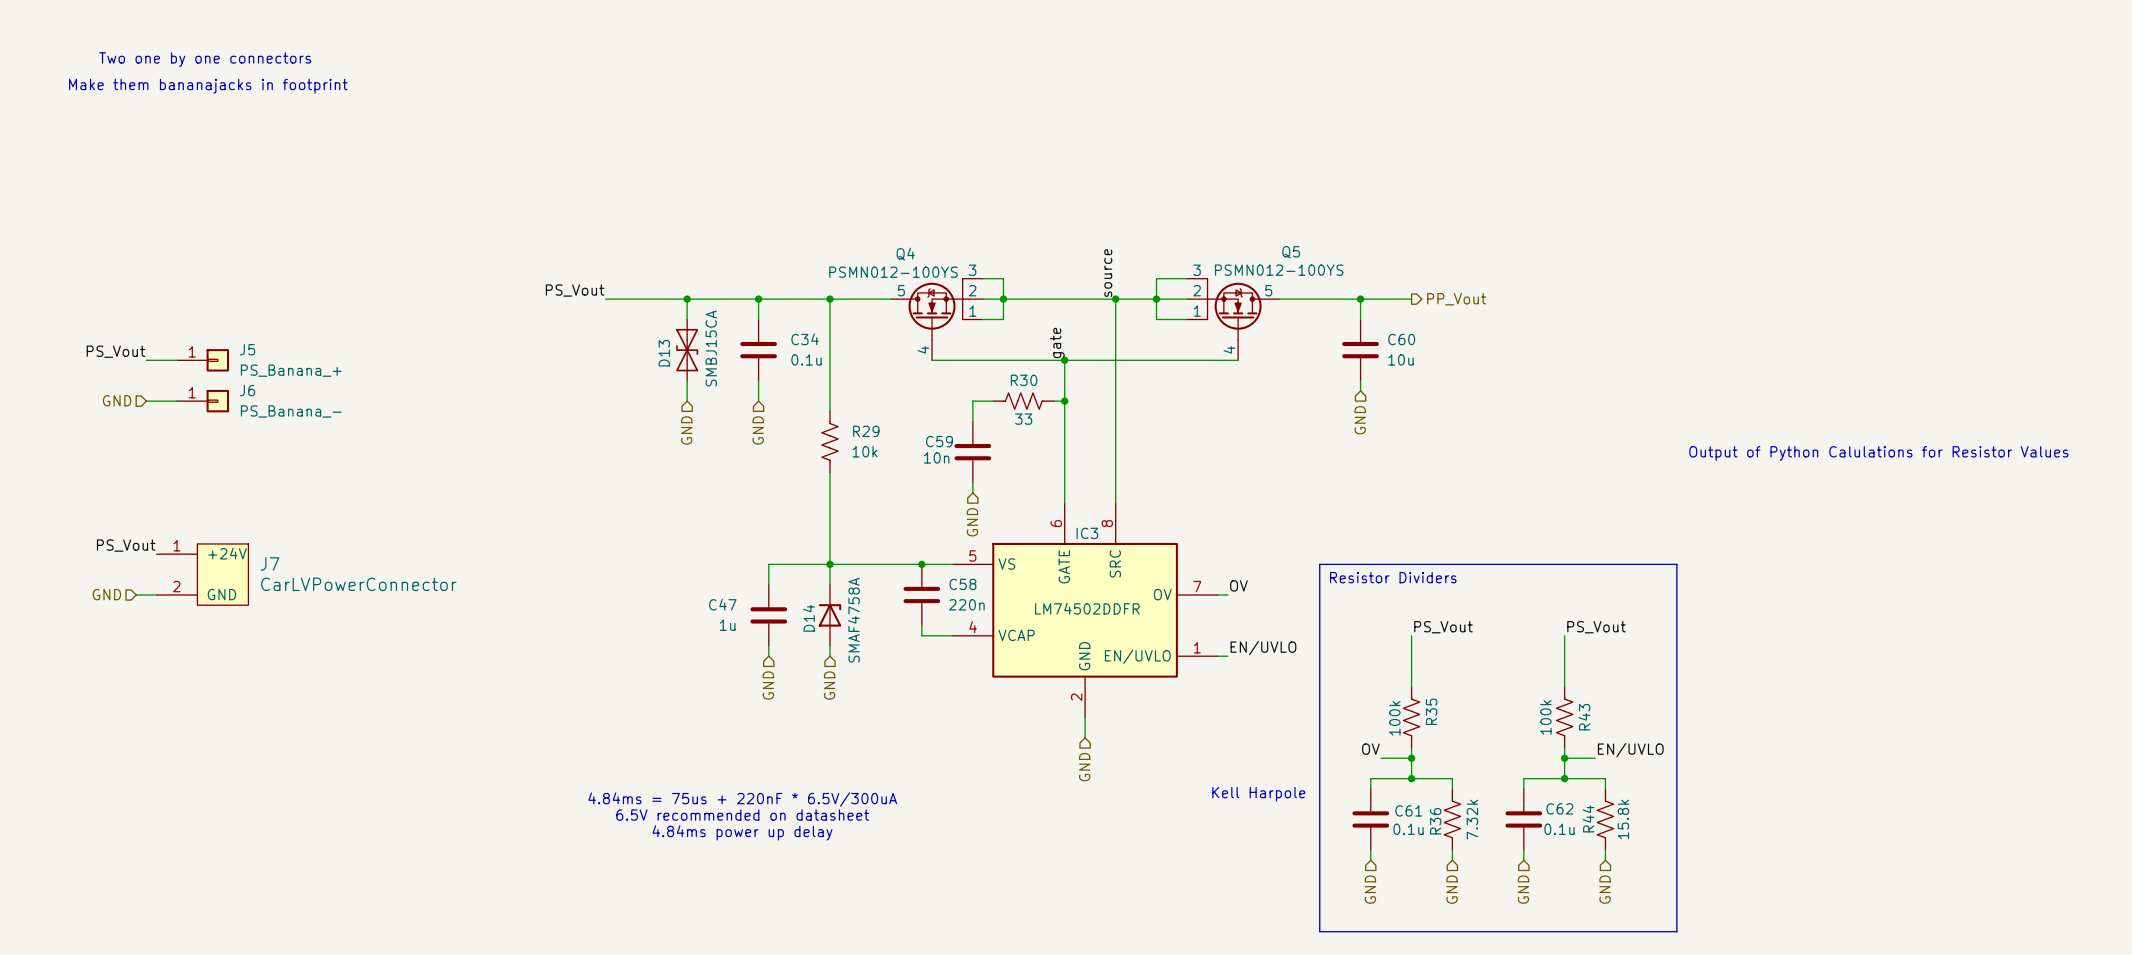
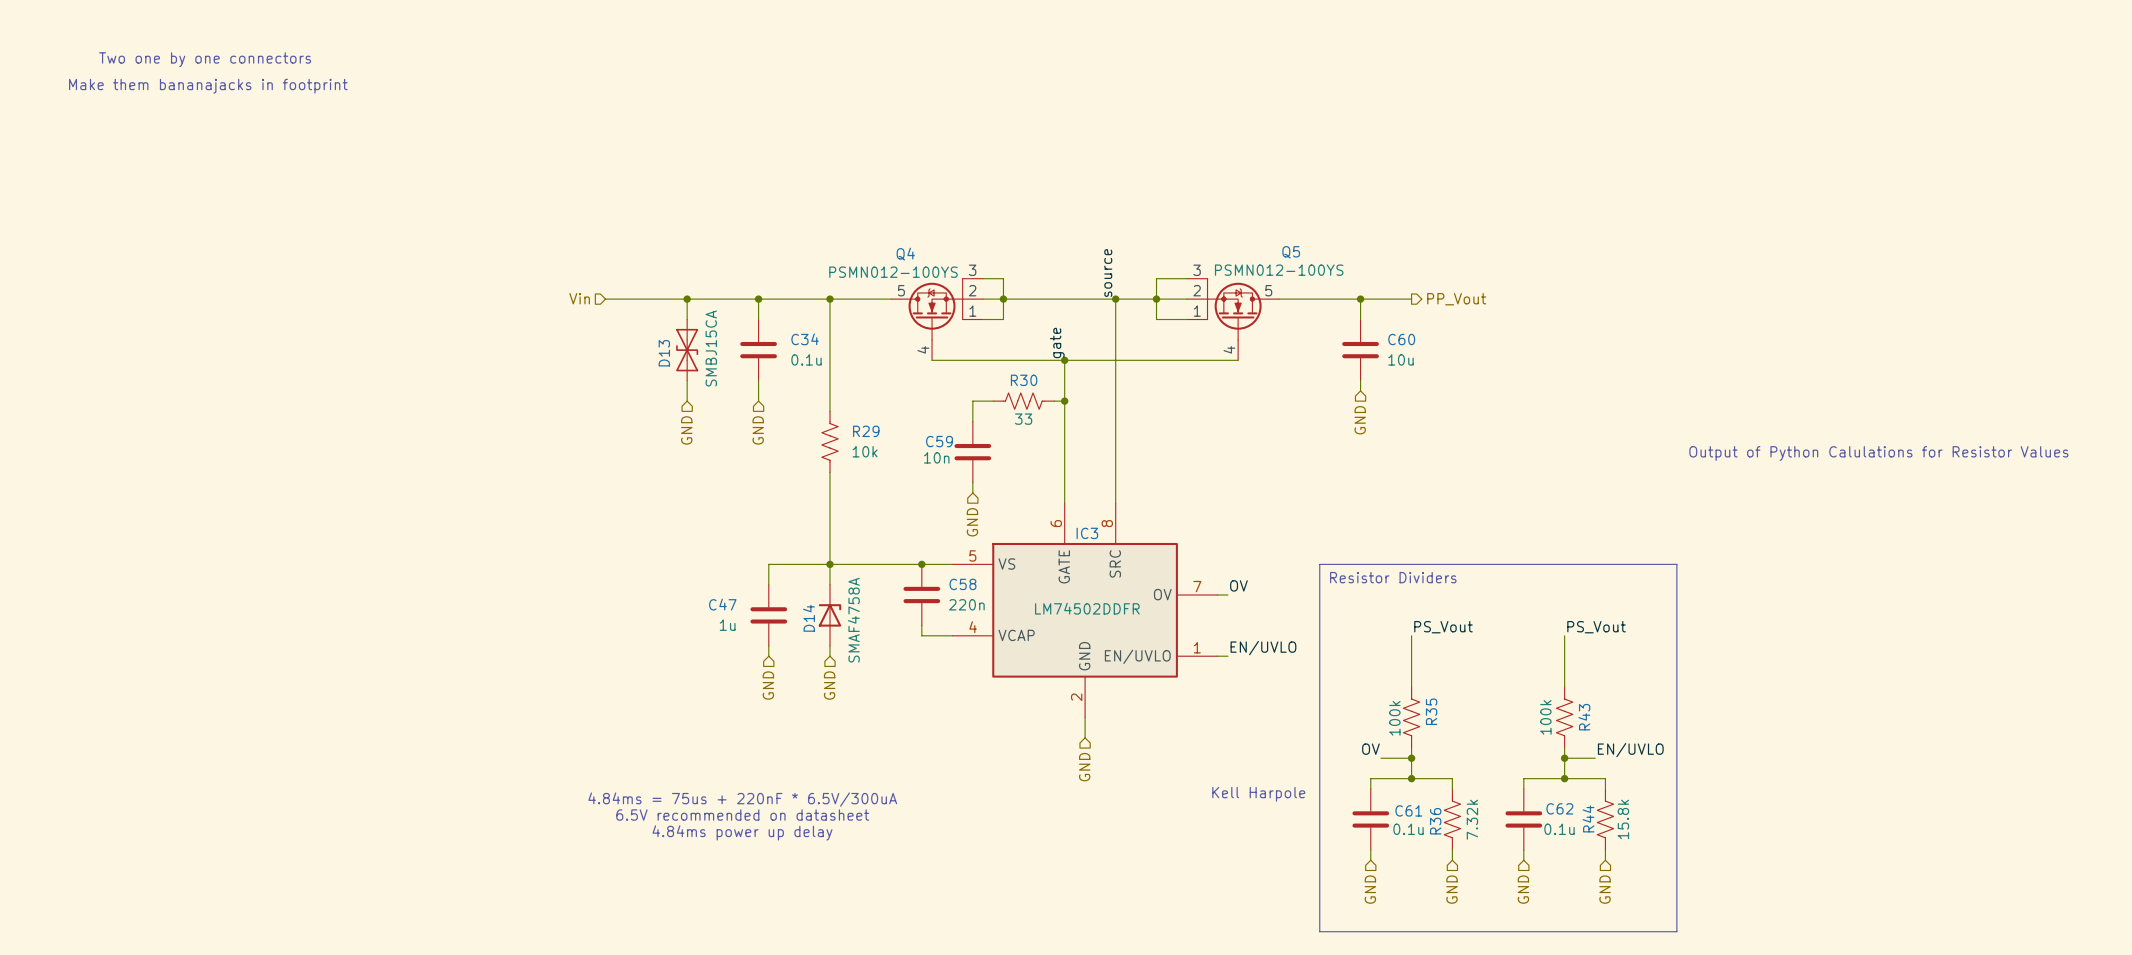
label: PS_Vout (575, 290) -> none
hierarchical label: none -> Vin (579, 298)
label: PS_Vout (115, 351) -> none
wire: (146, 360) (177, 360) -> none
J5: PS_Banana_+ (203, 360) -> none
hierarchical label: GND (117, 400) -> none
wire: (146, 401) (177, 401) -> none
J6: PS_Banana_- (203, 401) -> none
label: PS_Vout (126, 545) -> none
J7: CarLVPowerConnector (202, 574) -> none
hierarchical label: GND (106, 594) -> none
wire: (136, 594) (156, 594) -> none

